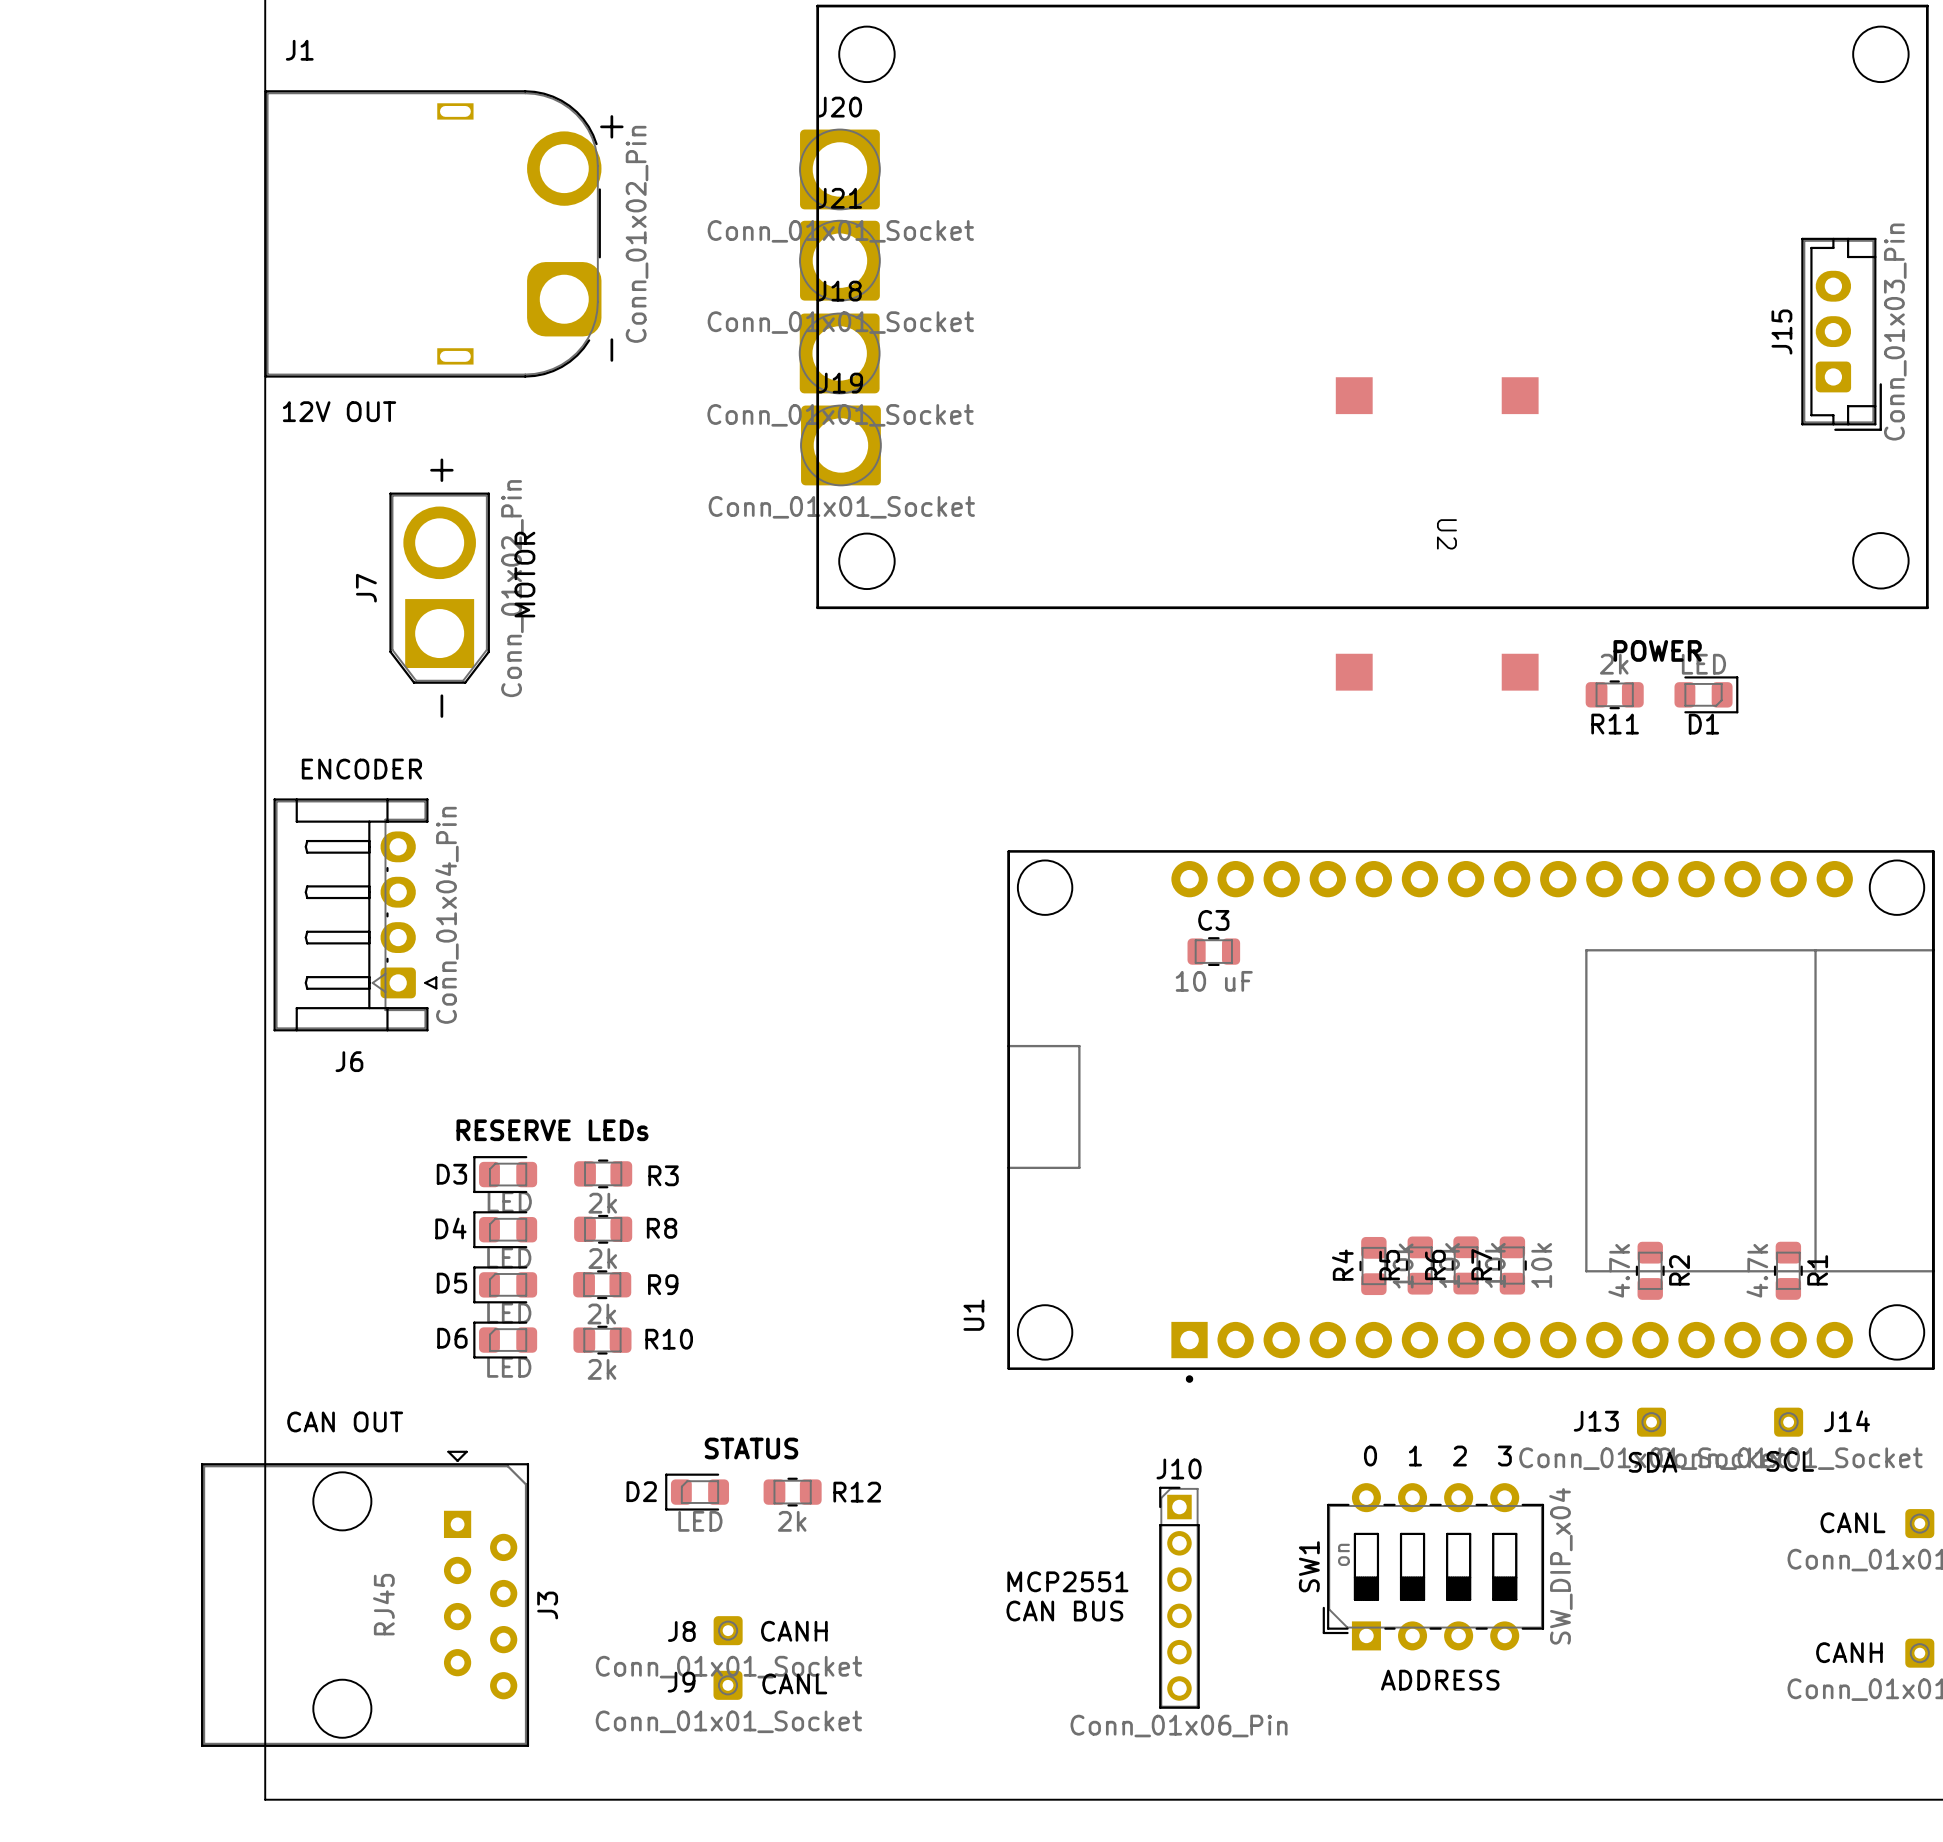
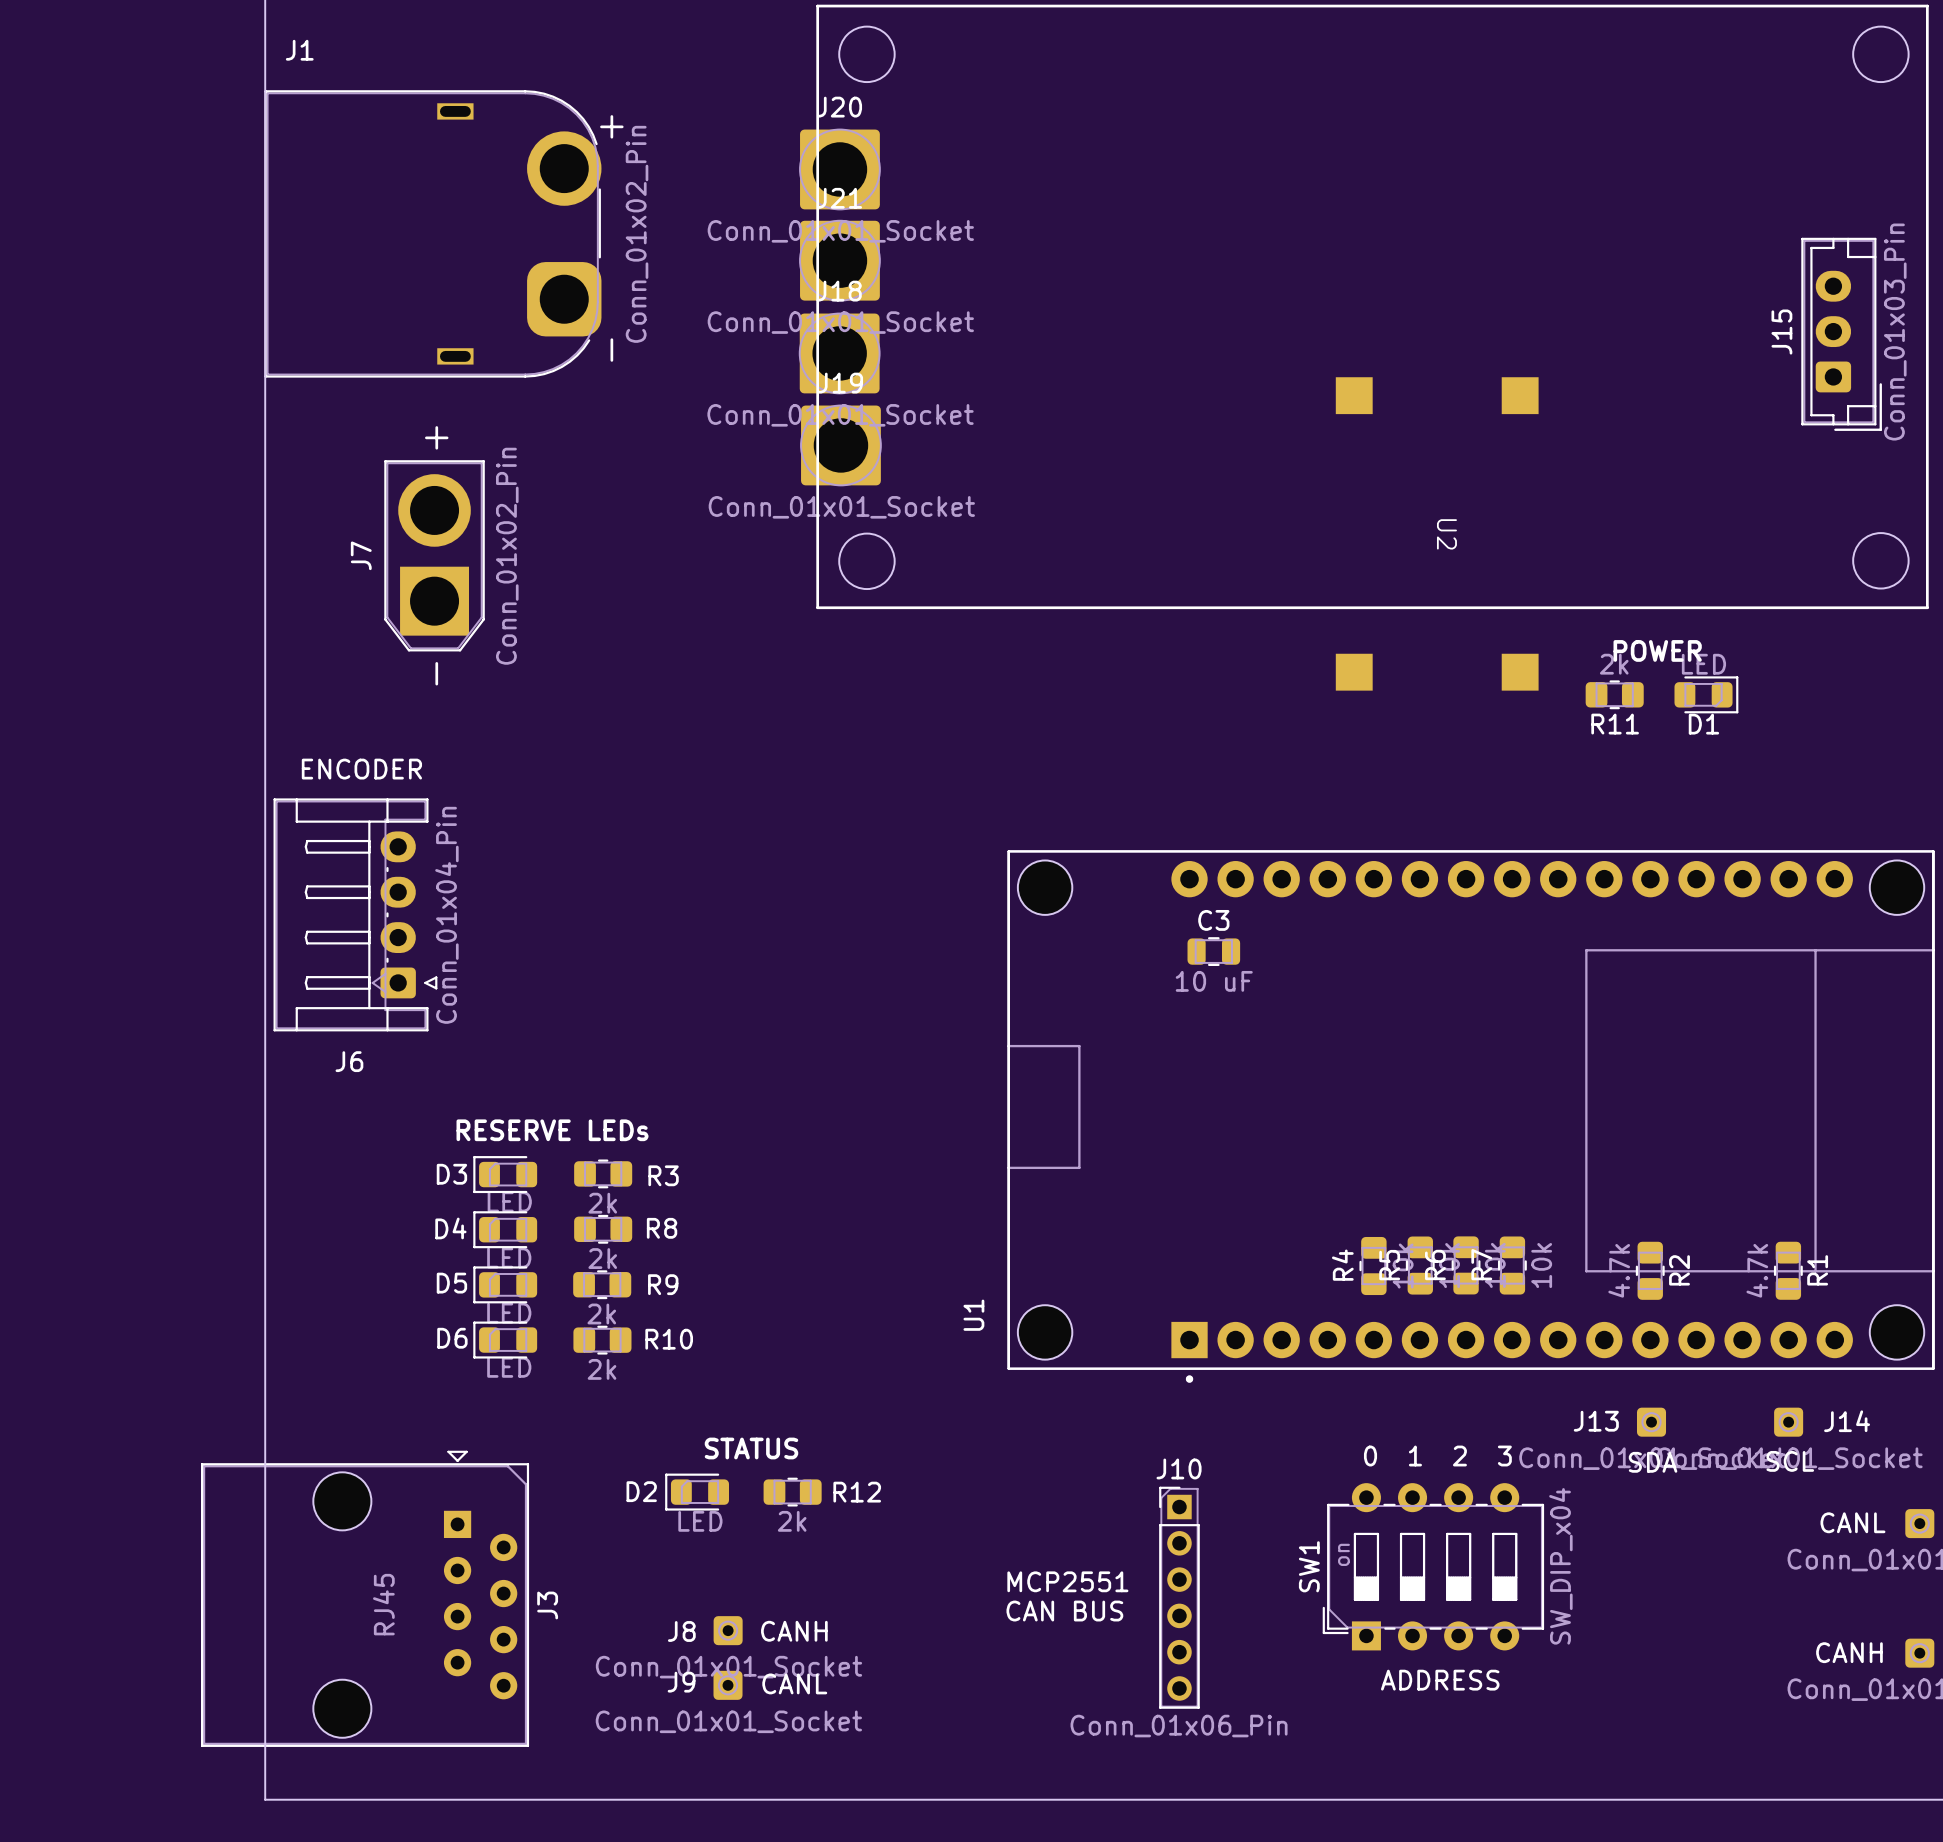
text: 12V OUT (339, 411) -> none
text: MOTOR (524, 574) -> none
J7 position: (439, 588) -> (434, 555)
text: CAN OUT (345, 1421) -> none

